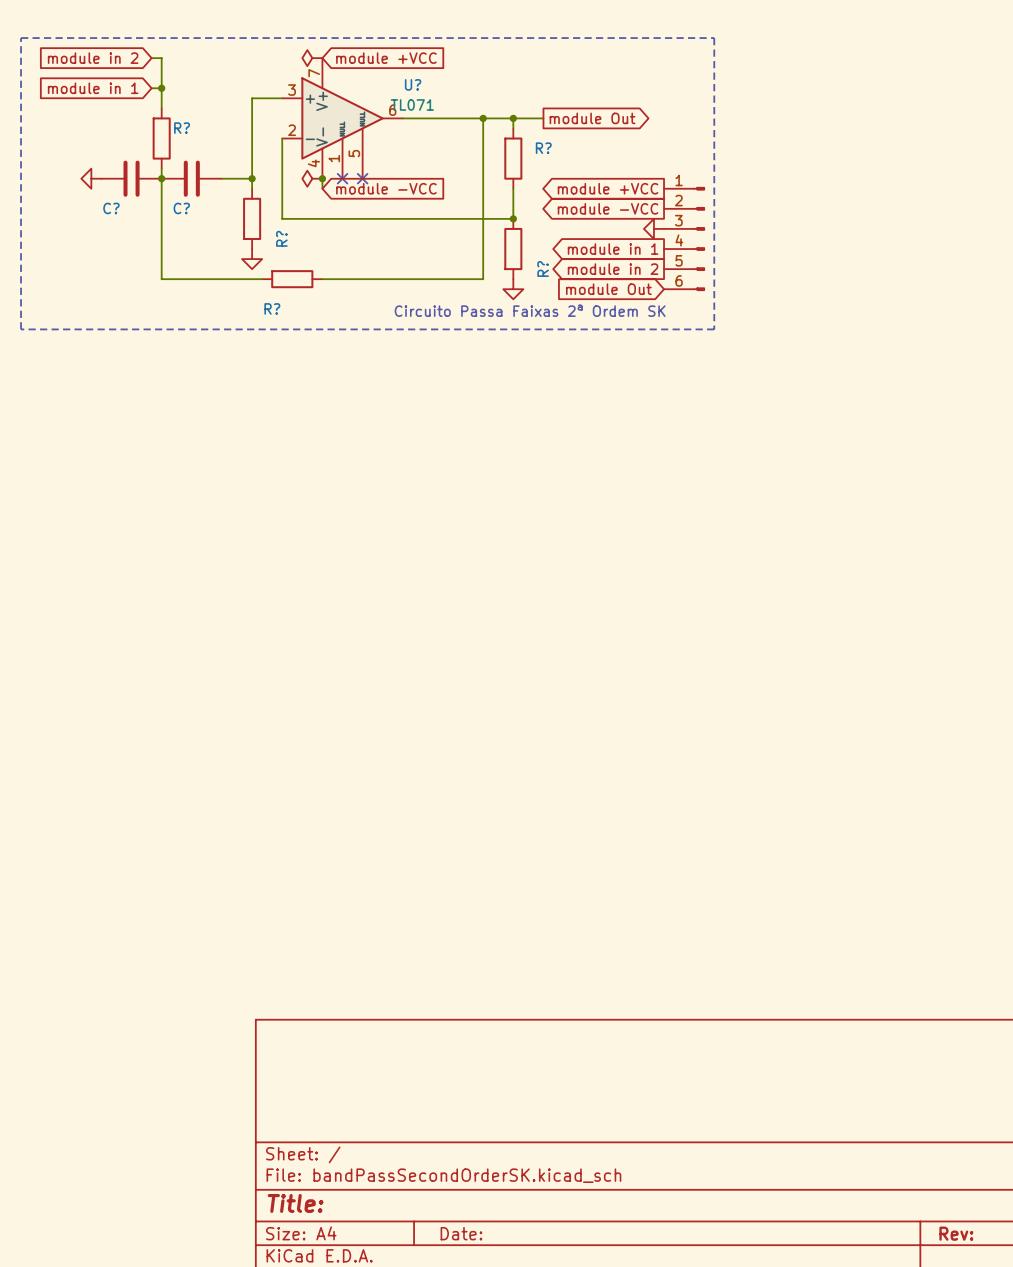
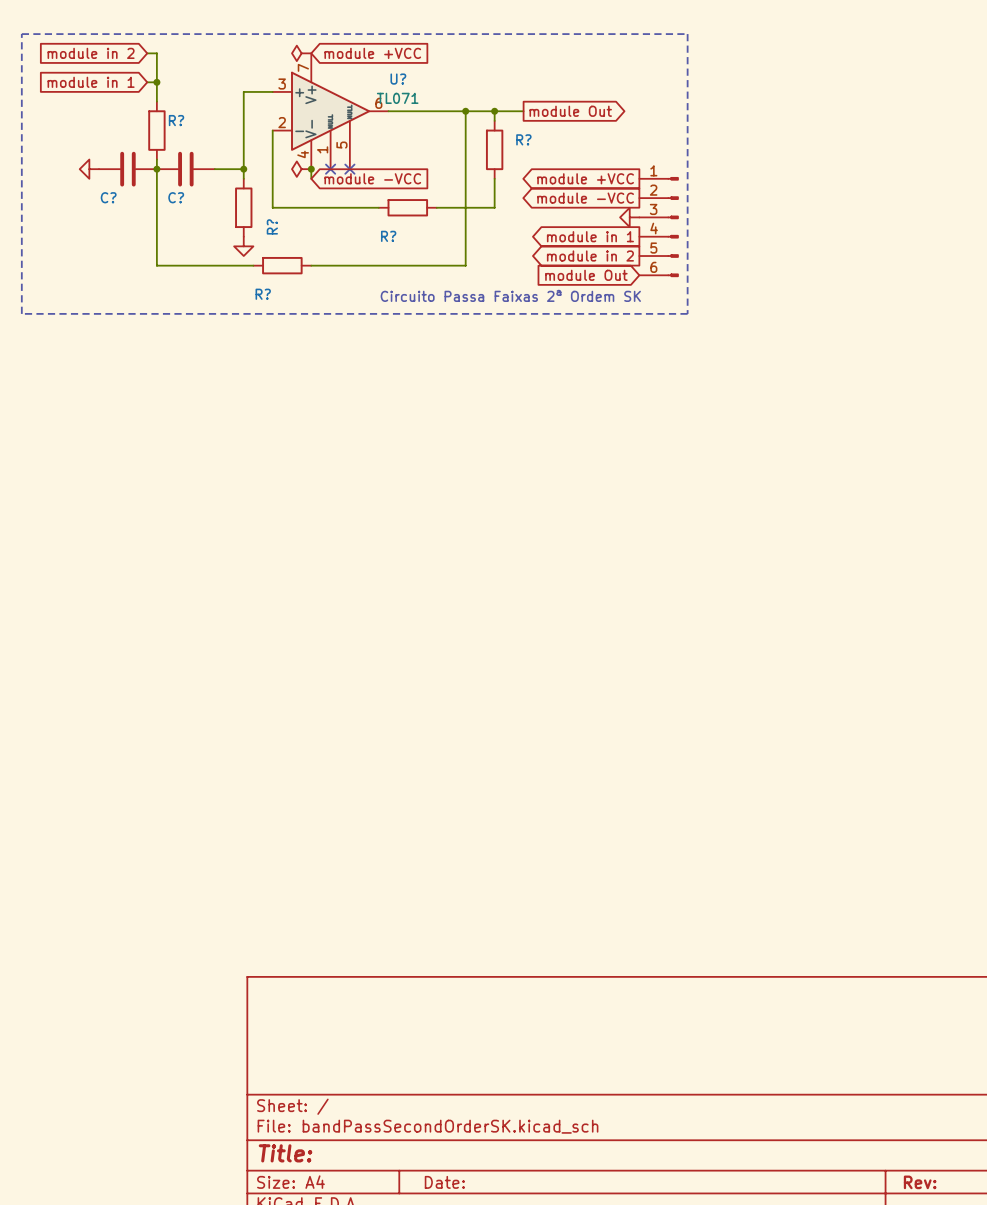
wire: (392, 218) (453, 218) -> none
junction: (513, 218) -> none
R? rotation: 0° (513, 249) -> 90° clockwise (407, 207)
R? position: (513, 249) -> (407, 207)
power symbol: (513, 289) -> none

